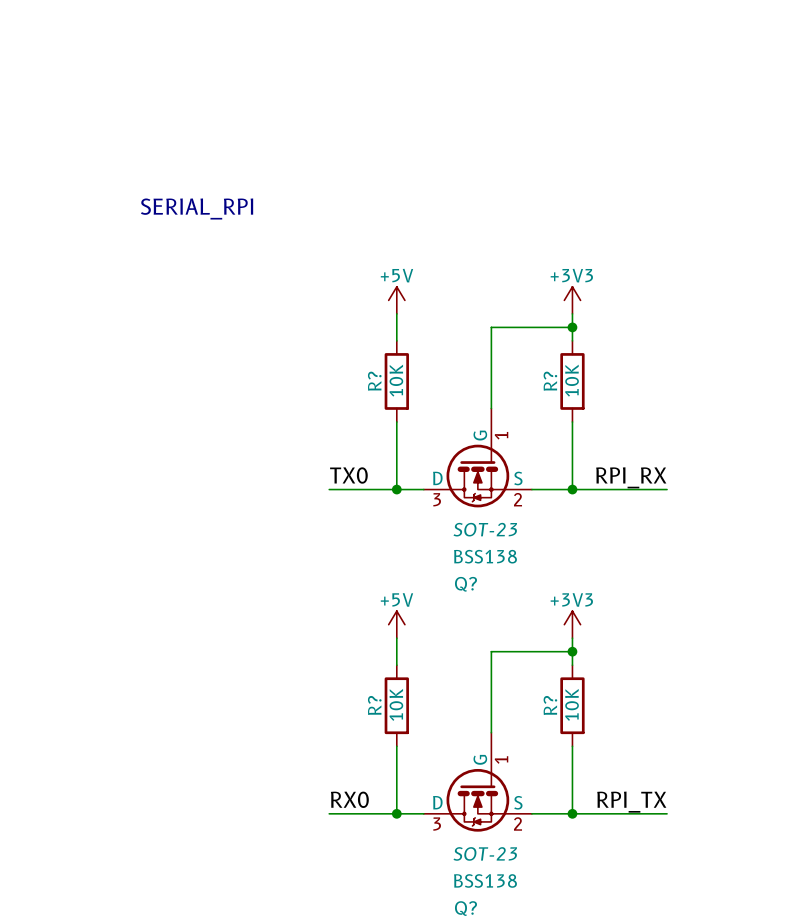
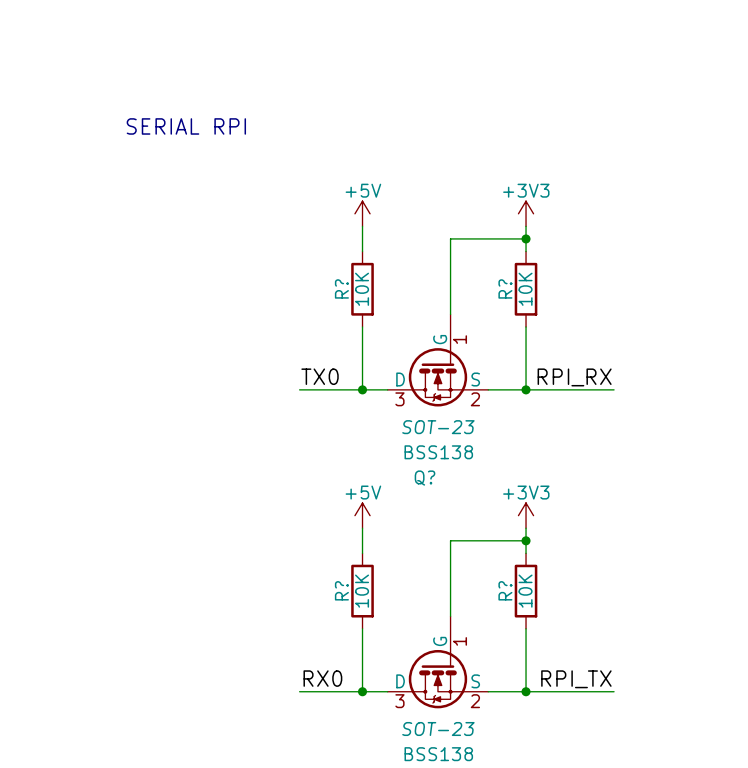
text: SERIAL_RPI (197, 208) -> SERIAL RPI (186, 126)

